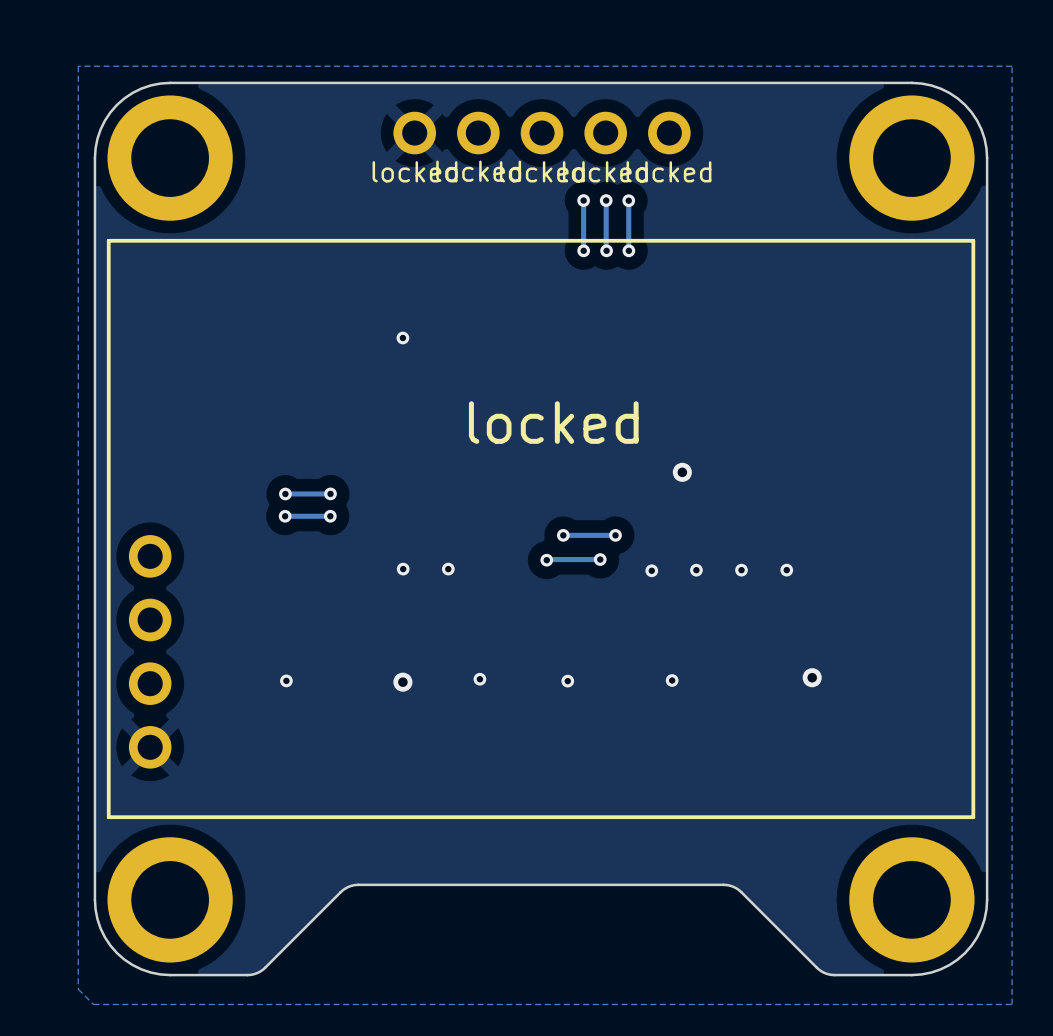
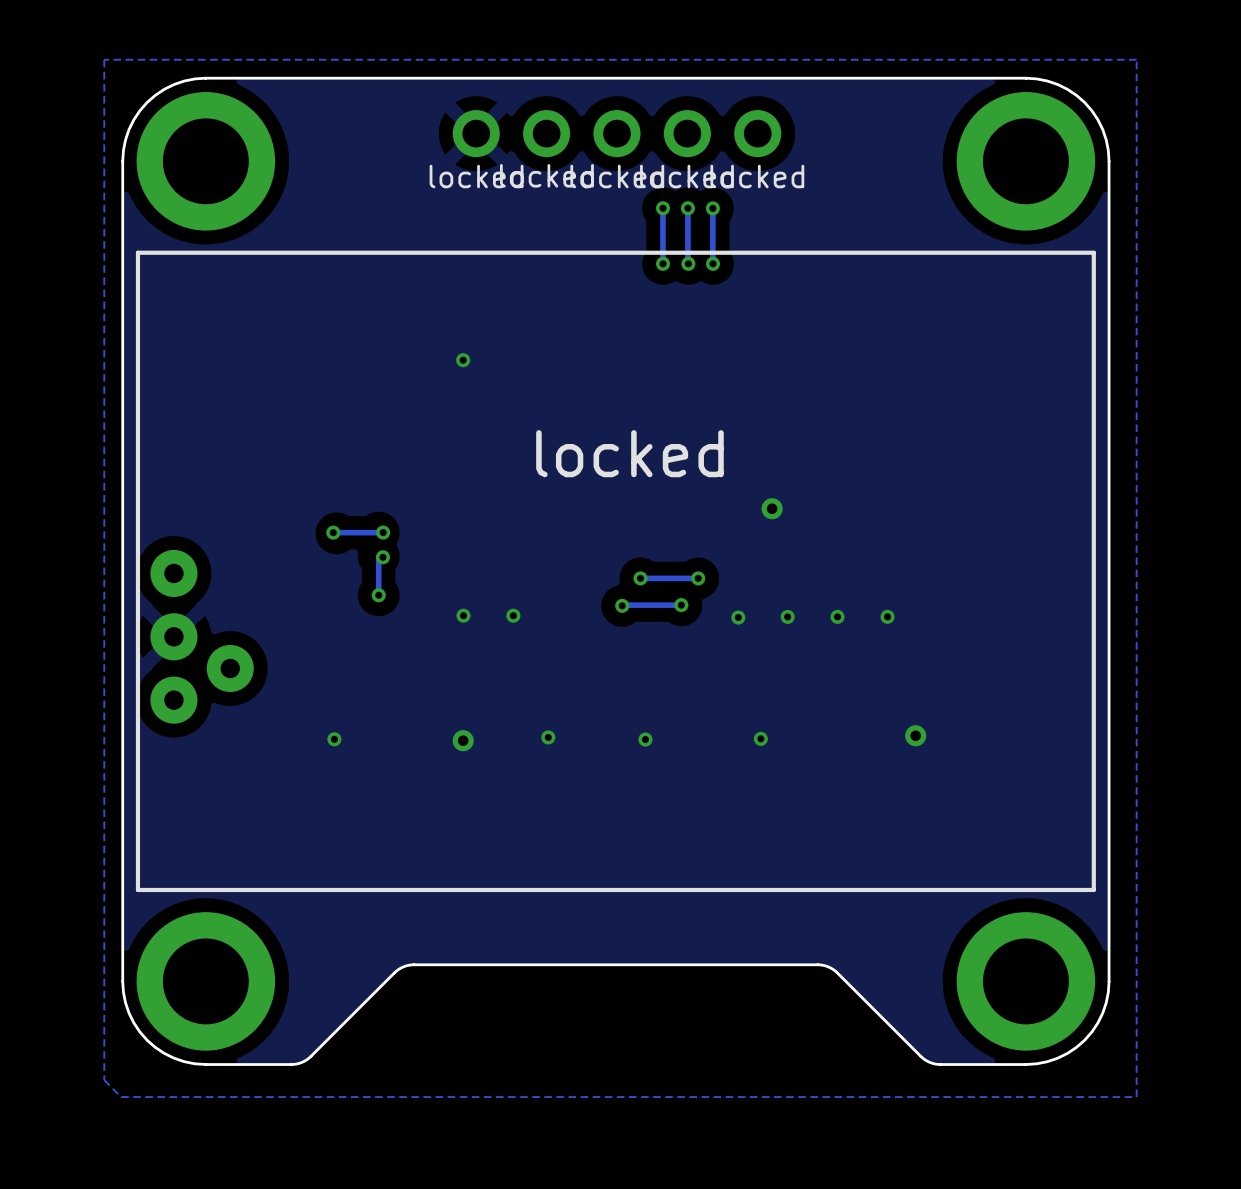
track: none -> (378, 556) (378, 595)
via position: (285, 516) -> (378, 595)
track: (329, 516) (284, 516) -> none
part: none -> (202, 636)
part: (150, 651) -> none

